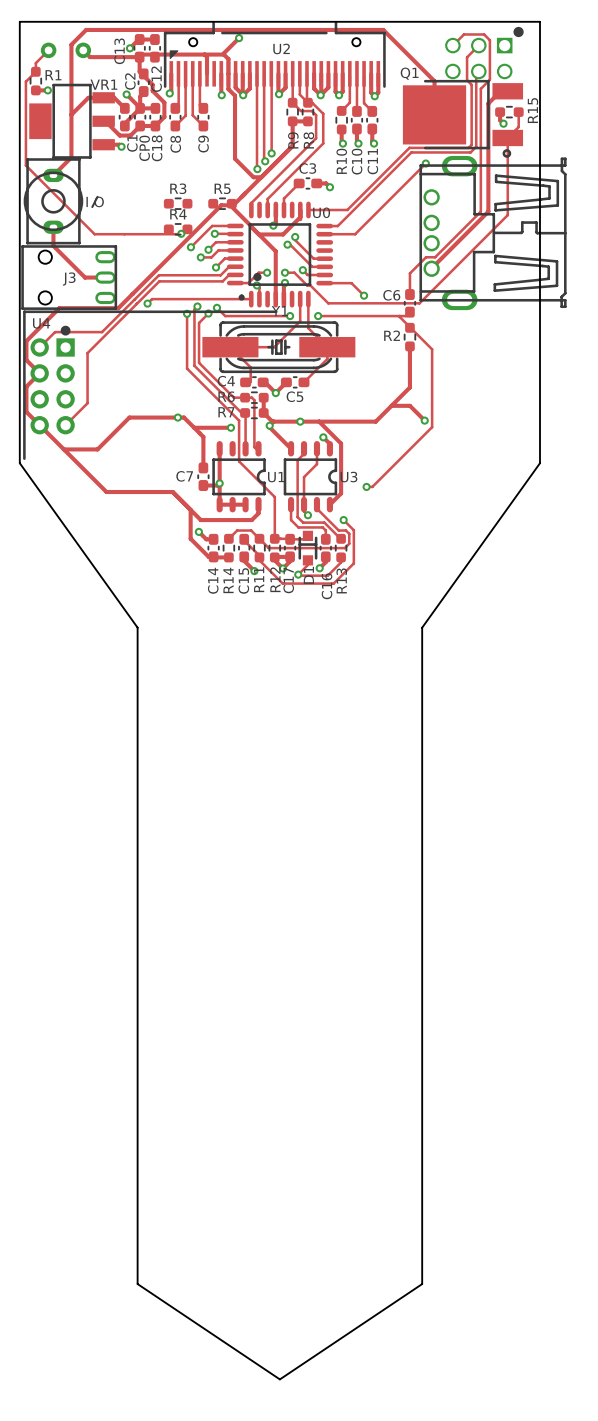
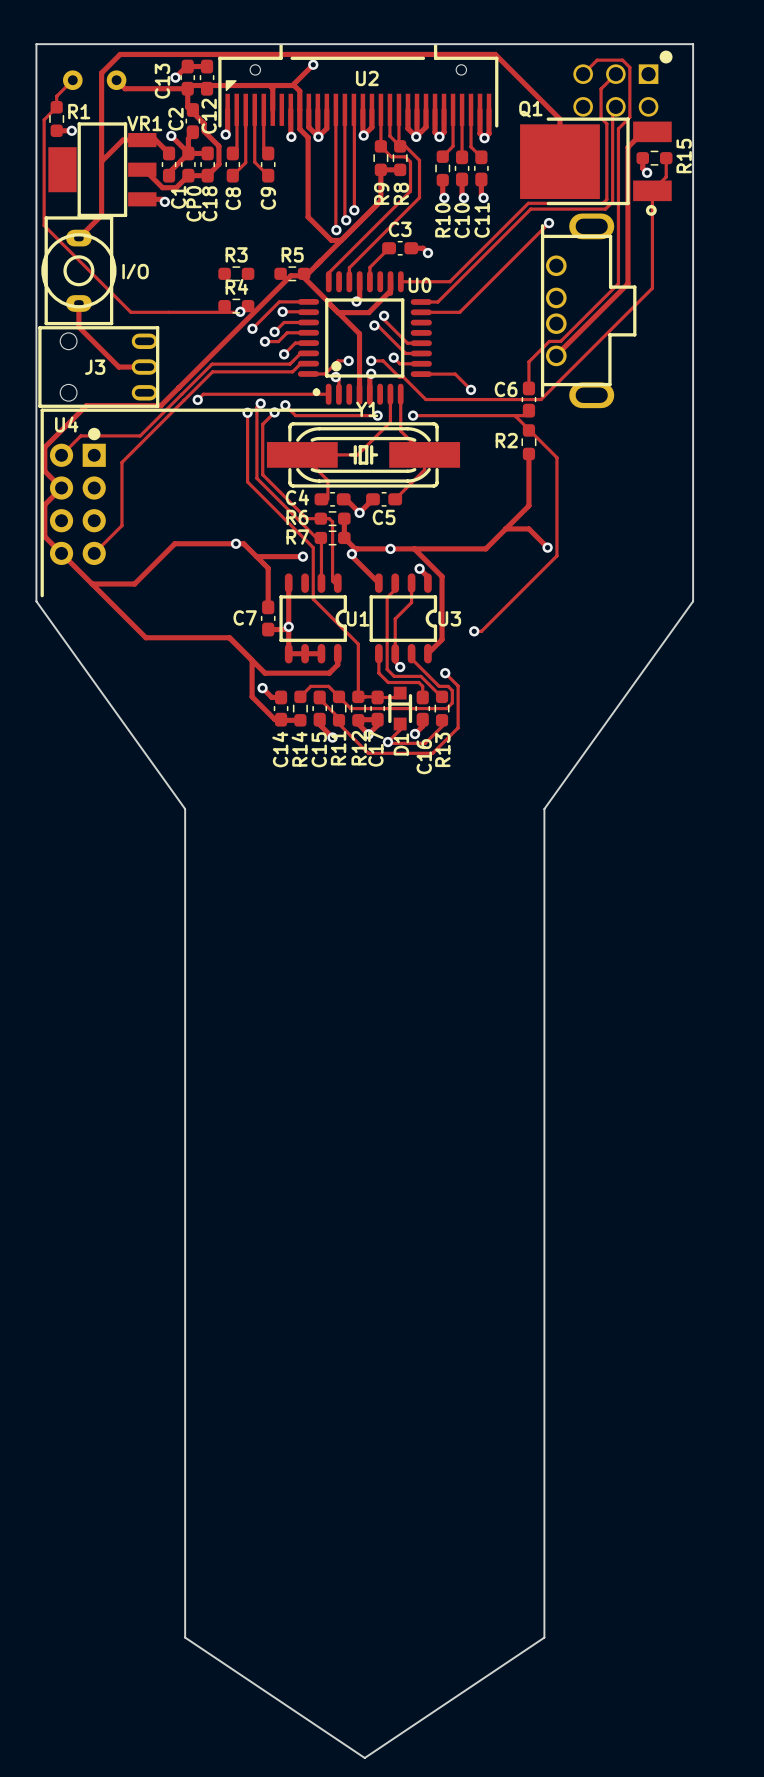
part: none -> (588, 310)
part: (493, 233) -> none

